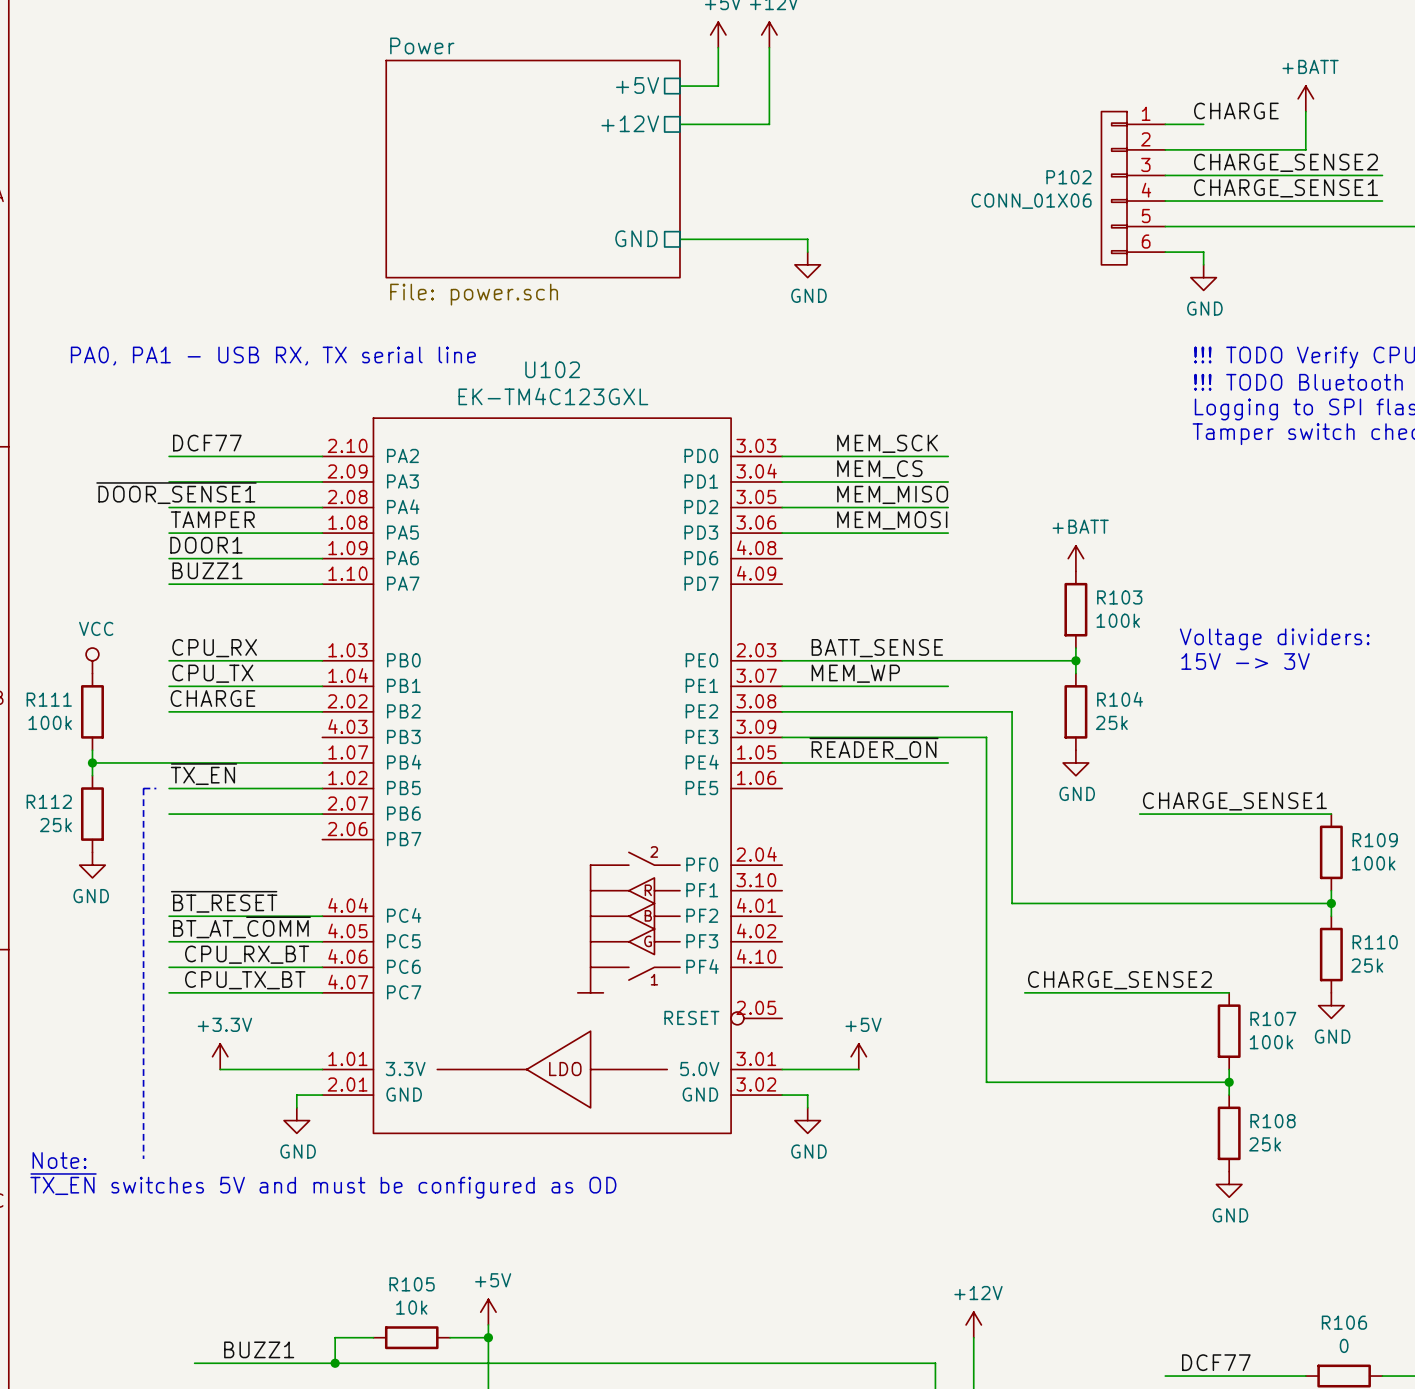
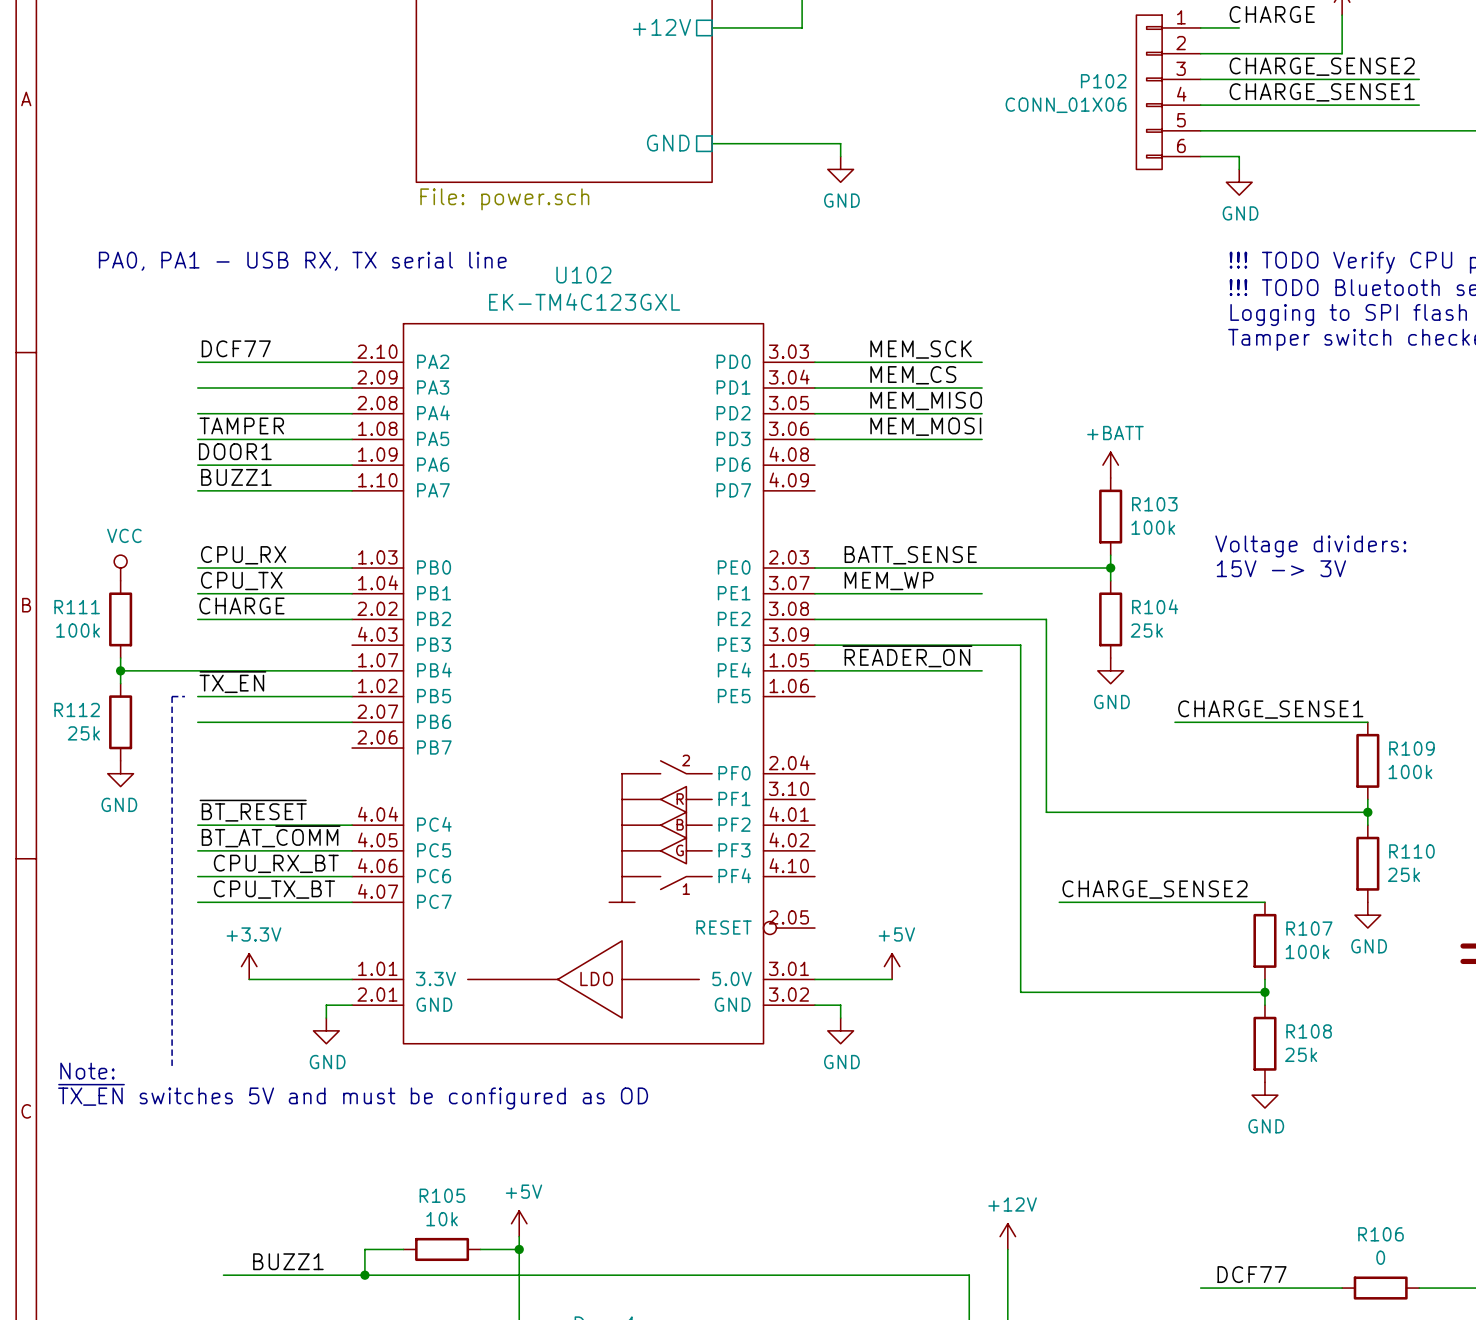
label: ~{DOOR_SENSE1} (176, 493) -> none

